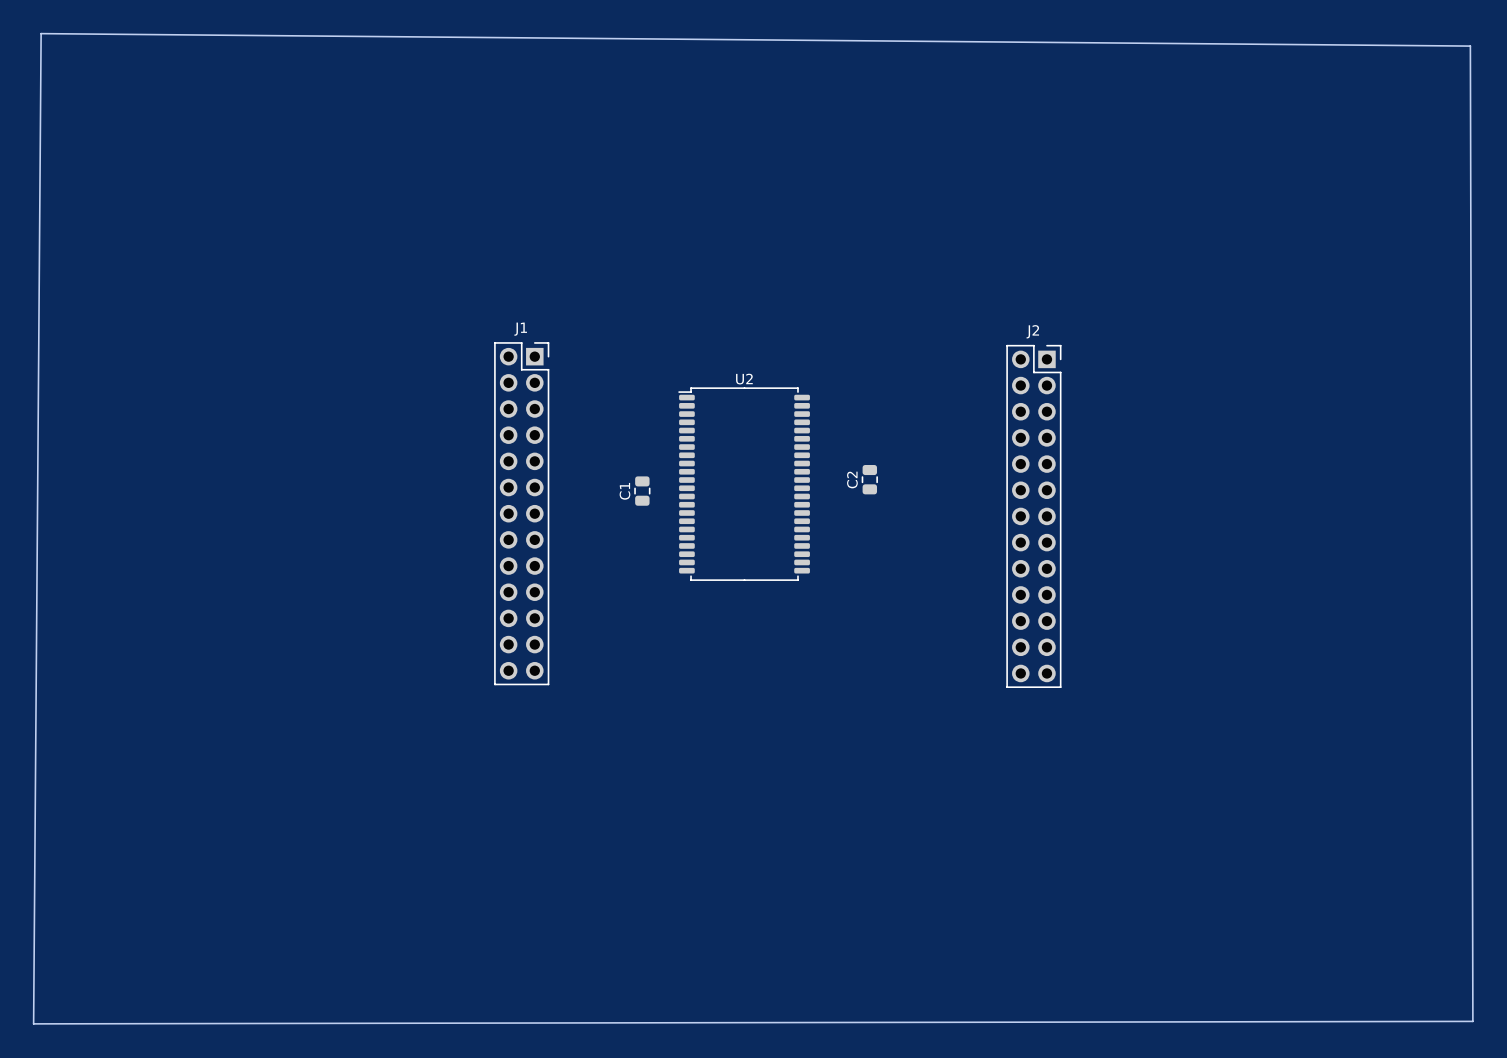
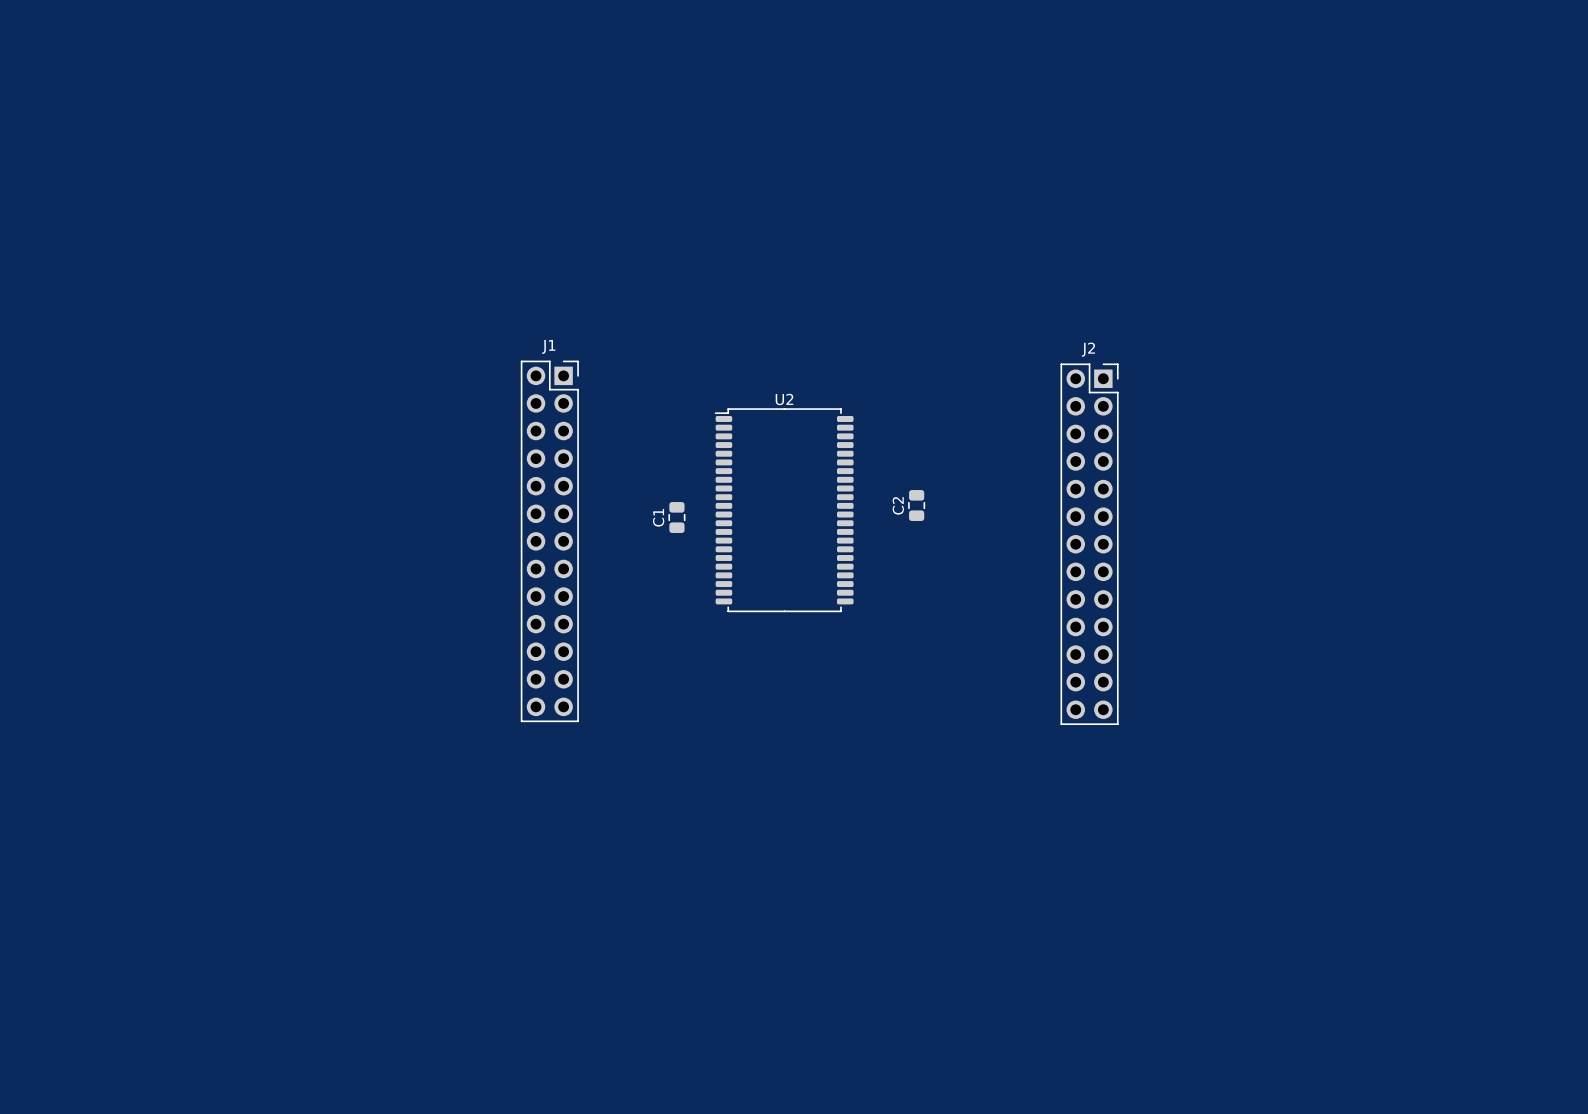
board edge: (41, 33) (1470, 46) (1472, 1021) (33, 1023) (41, 33) -> none

